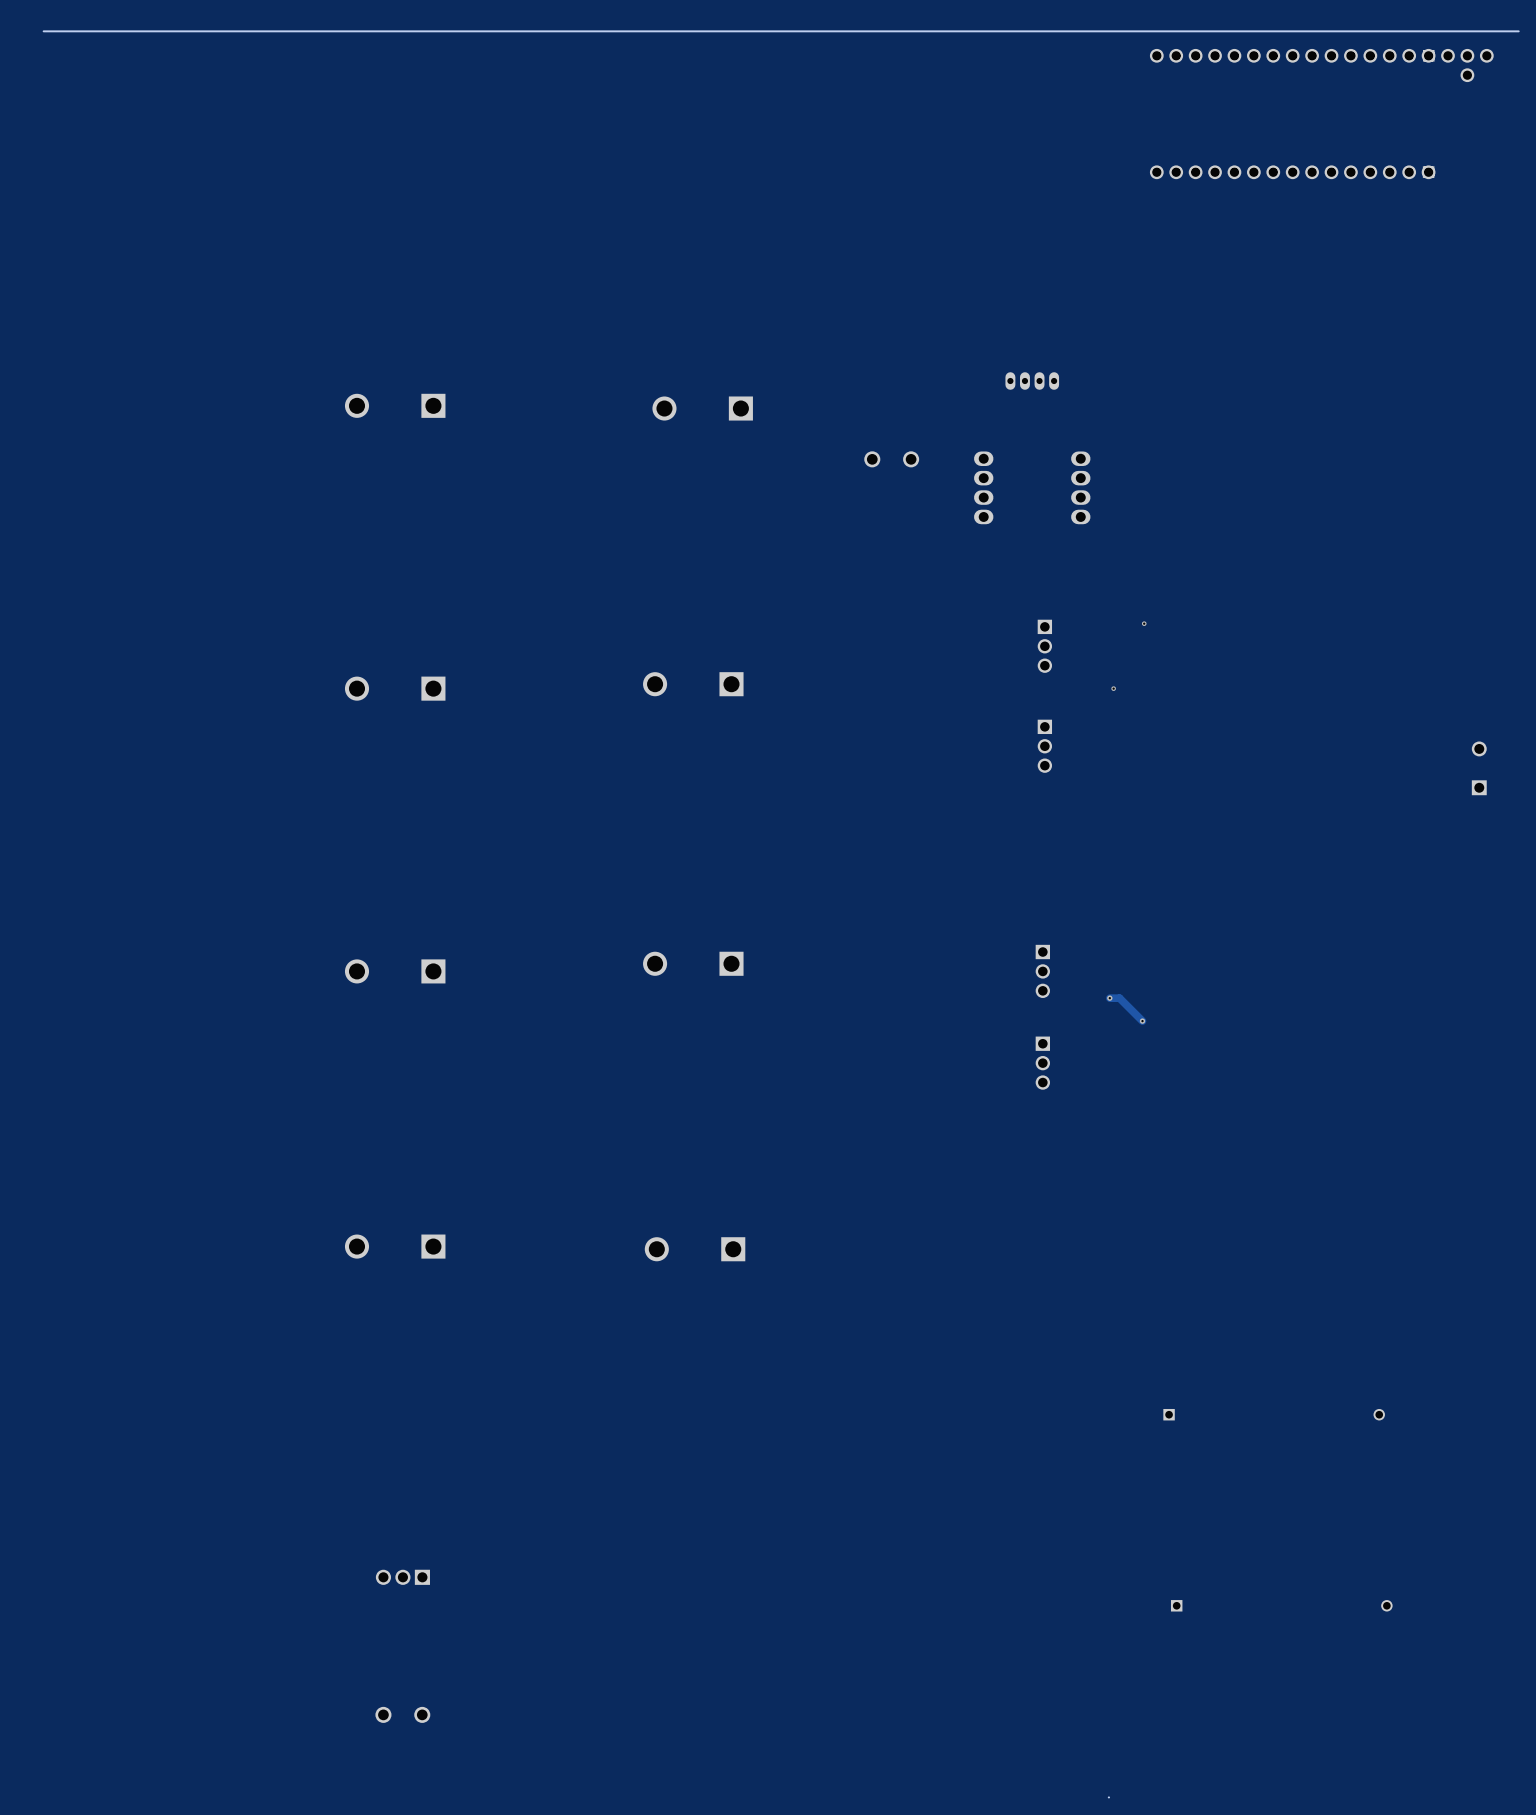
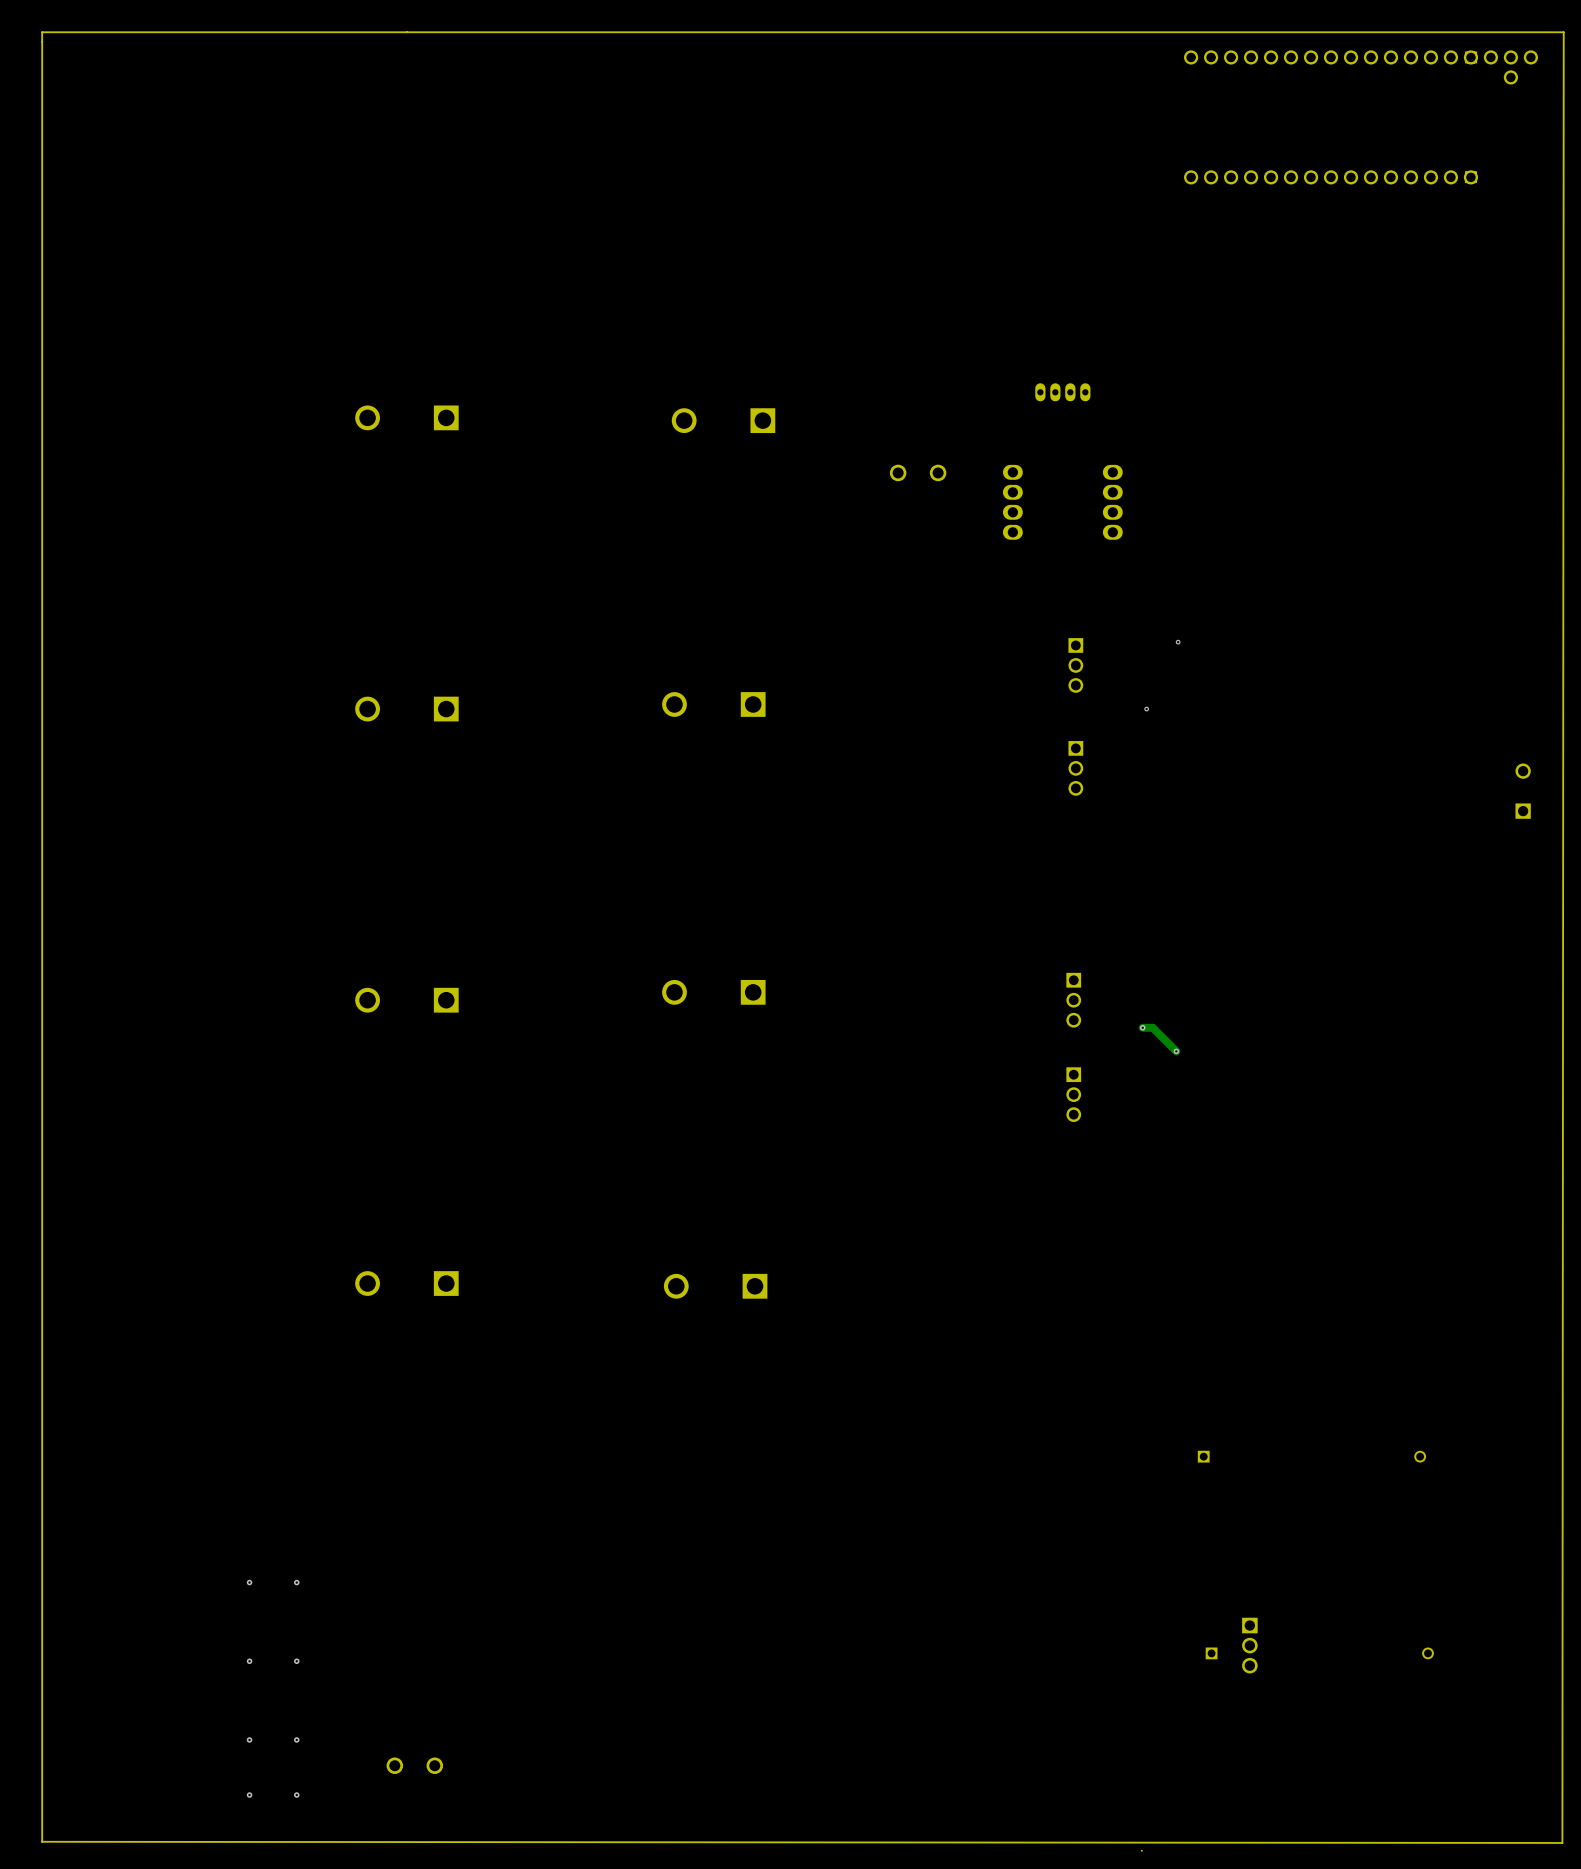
board edge: none -> (1563, 32) (1562, 1842) (42, 1841) (42, 32) (44, 32)
via: none -> (249, 1582)
via: none -> (296, 1582)
part: (402, 1577) -> none
part: none -> (1249, 1645)
via: none -> (249, 1661)
via: none -> (296, 1661)
via: none -> (249, 1739)
via: none -> (296, 1739)
via: none -> (249, 1795)
via: none -> (296, 1795)

